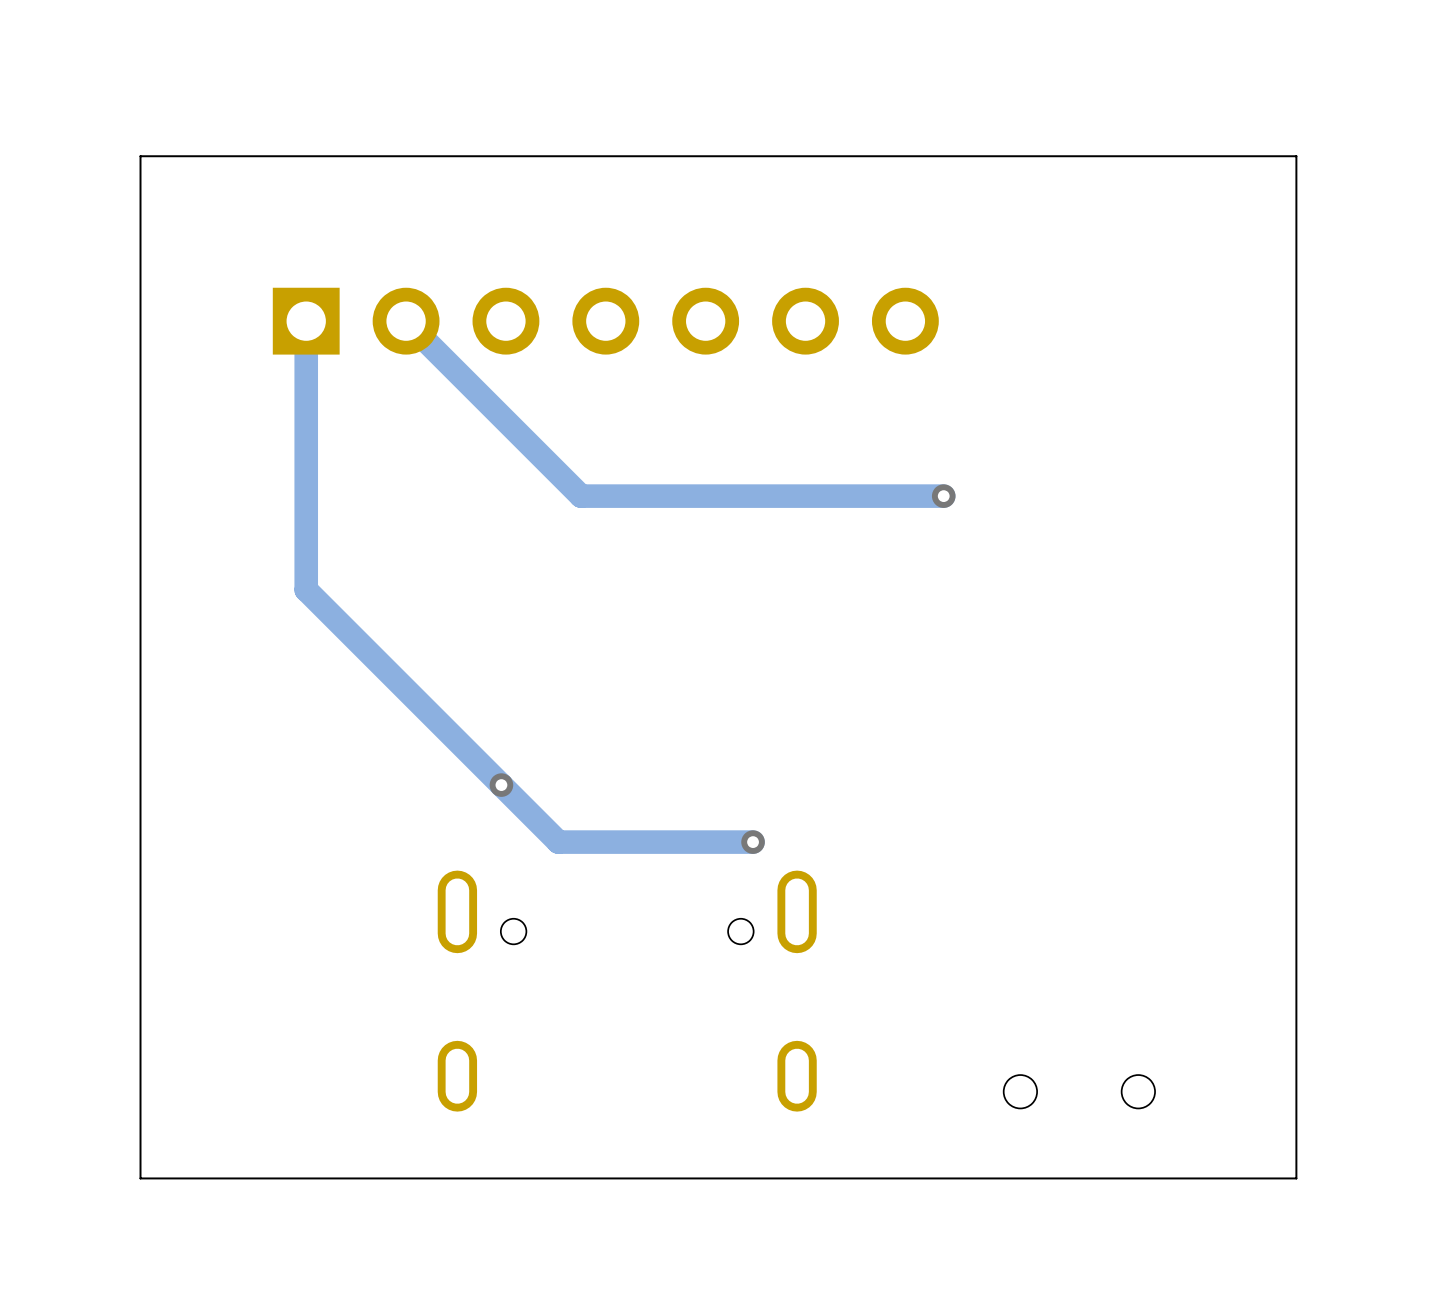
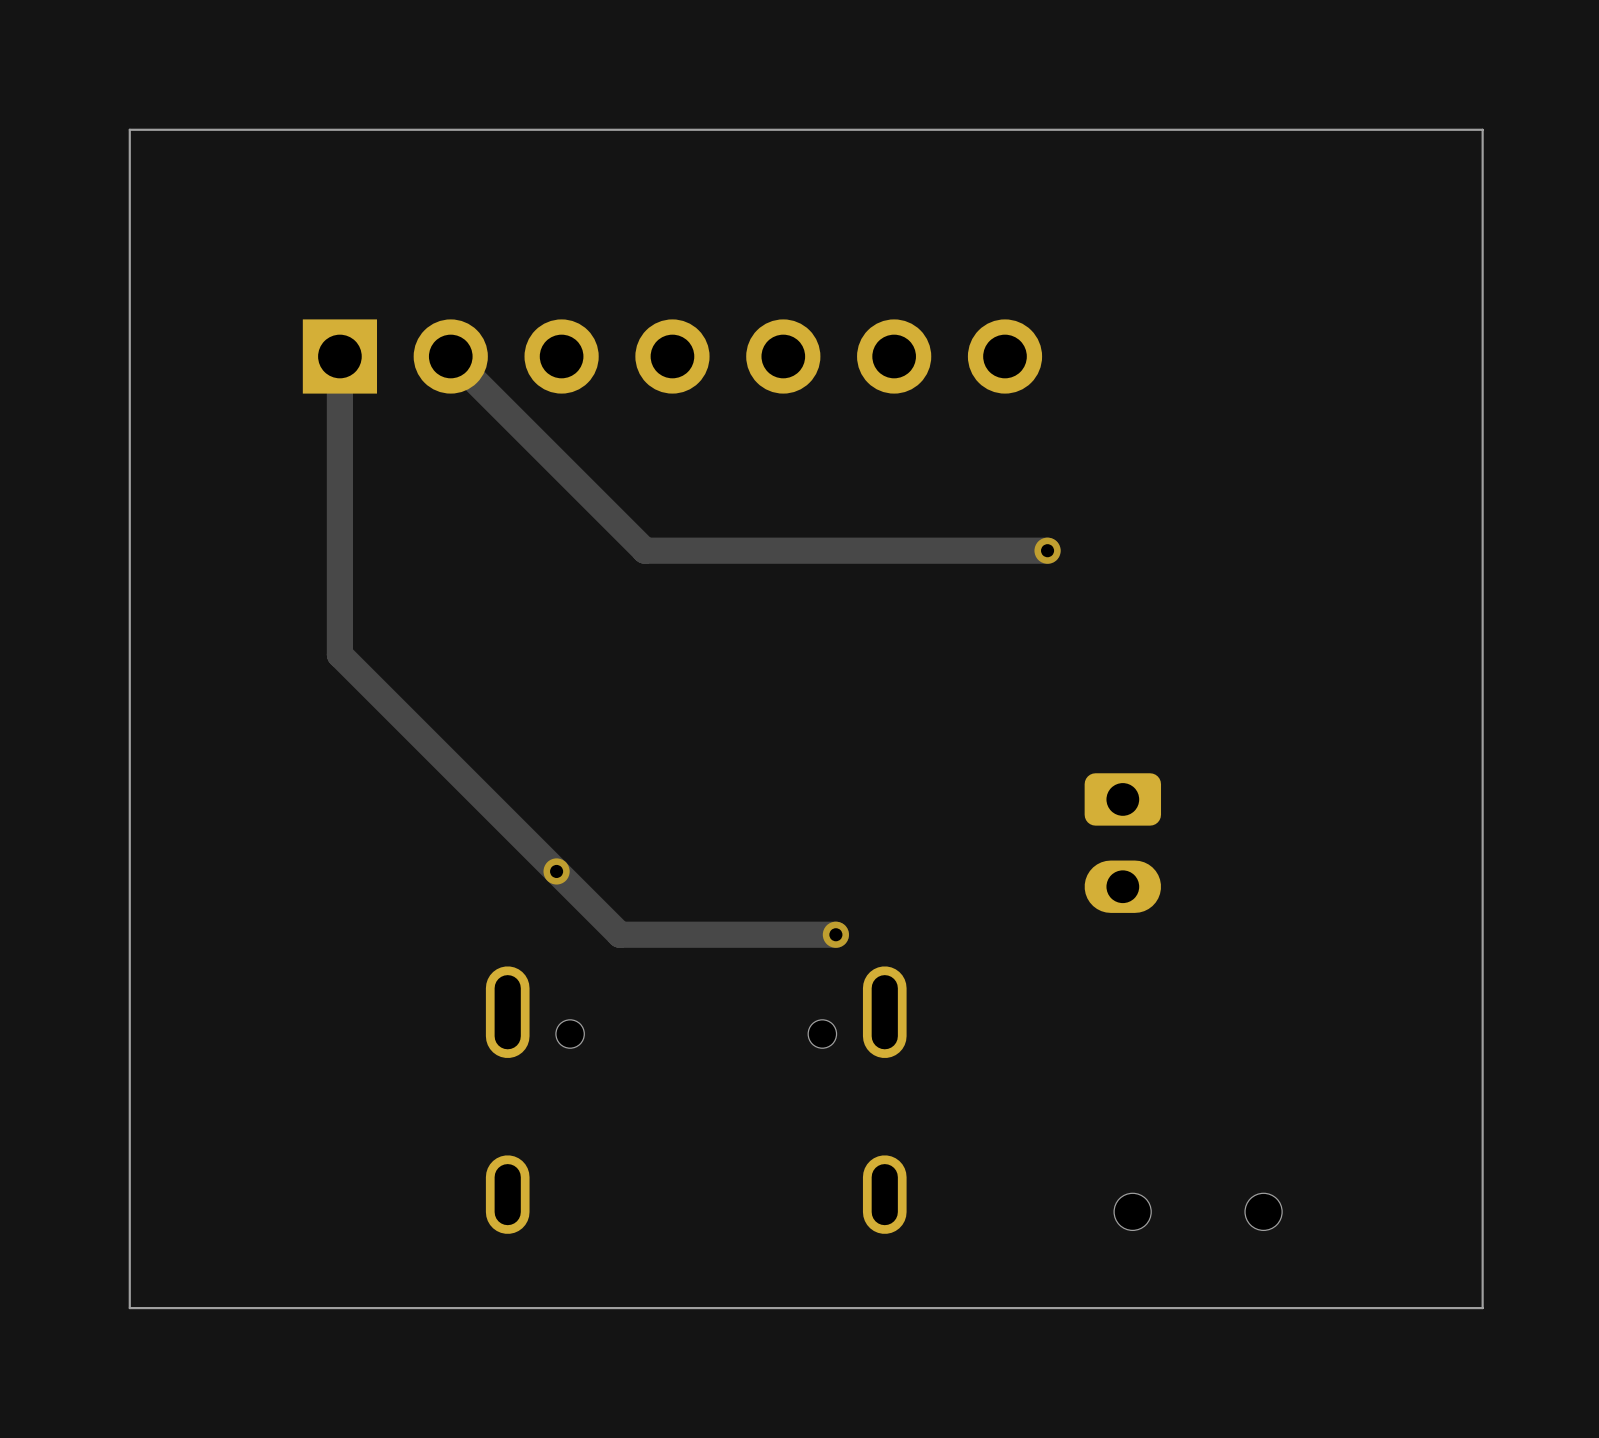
part: none -> (1122, 843)
board edge: (1296, 1178) (1296, 156) (140, 156) (140, 1178) -> (1439, 1308) (1482, 1308) (1482, 129) (129, 129) (129, 1308) (155, 1308)

